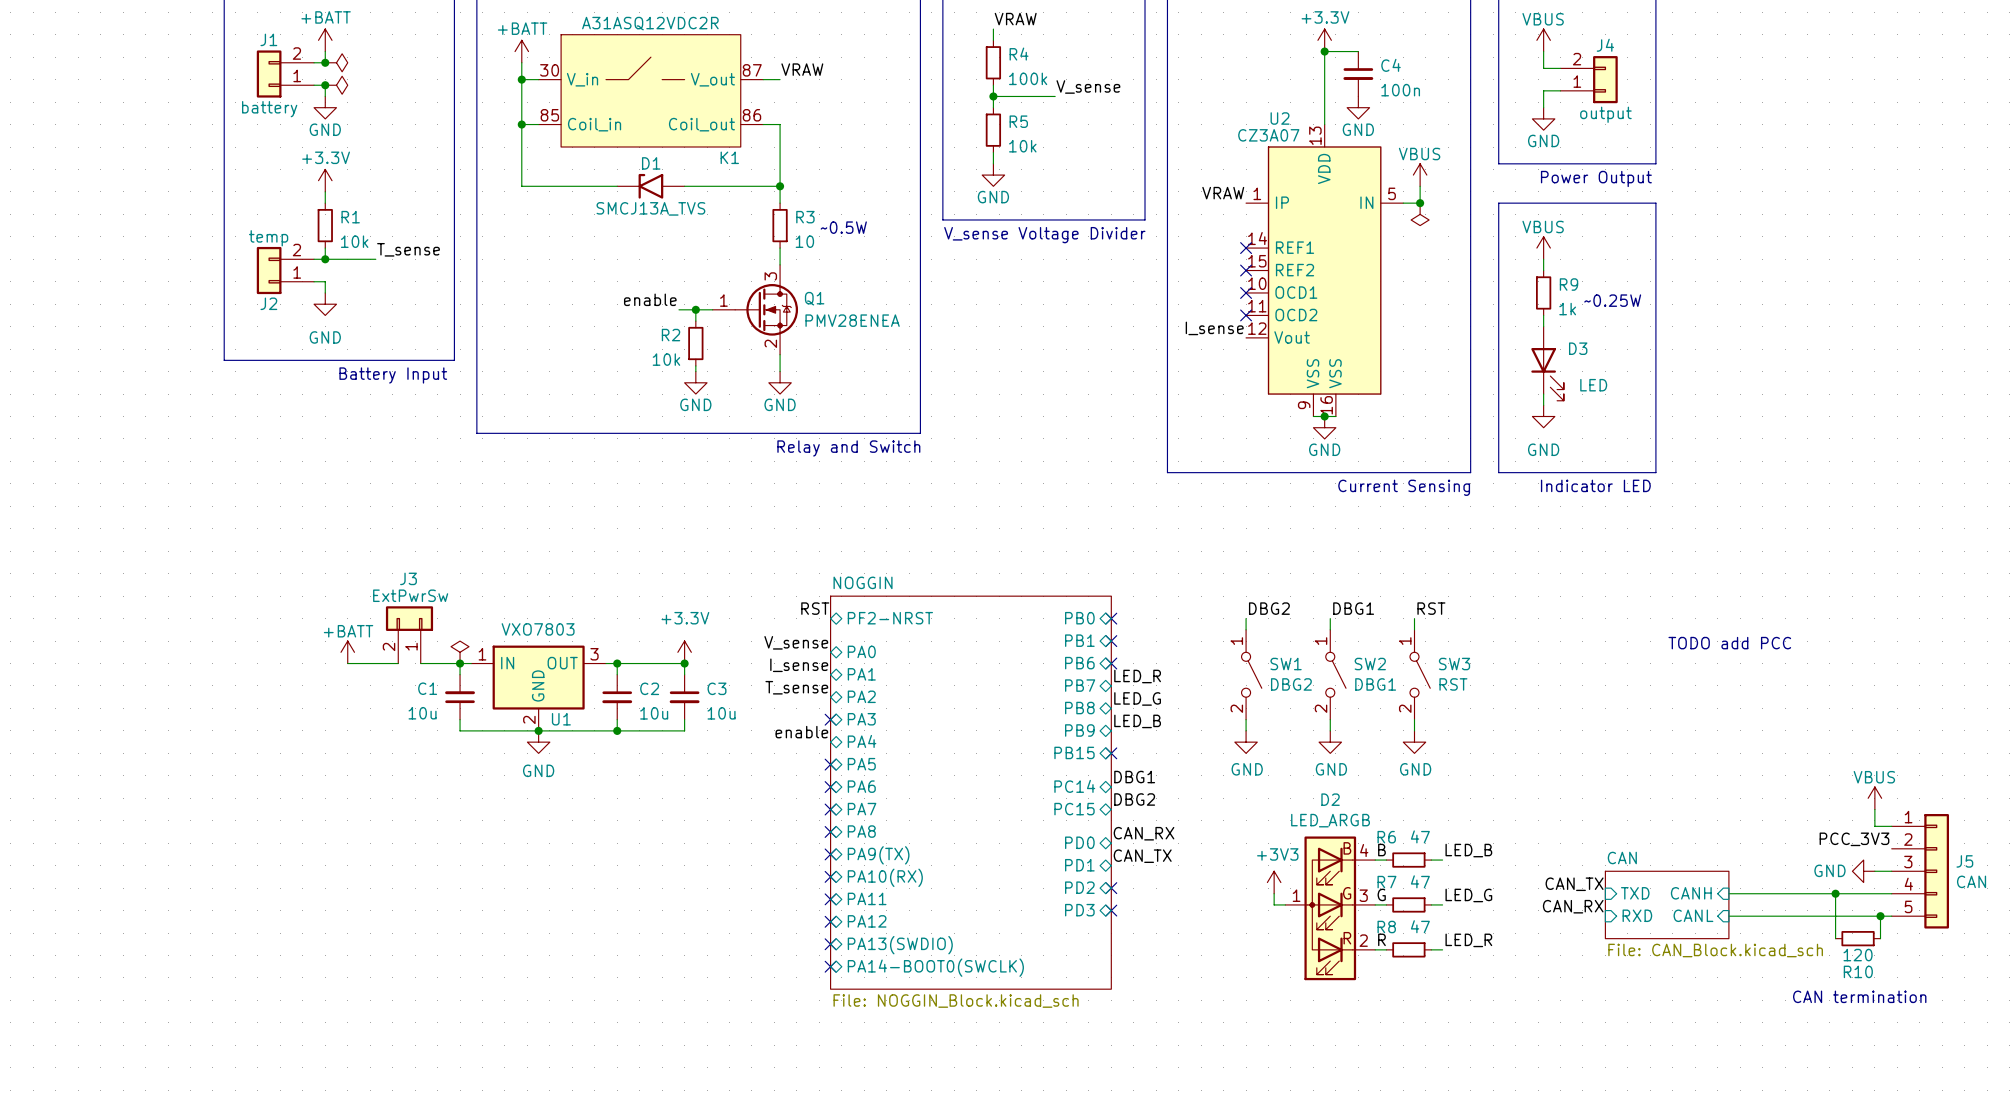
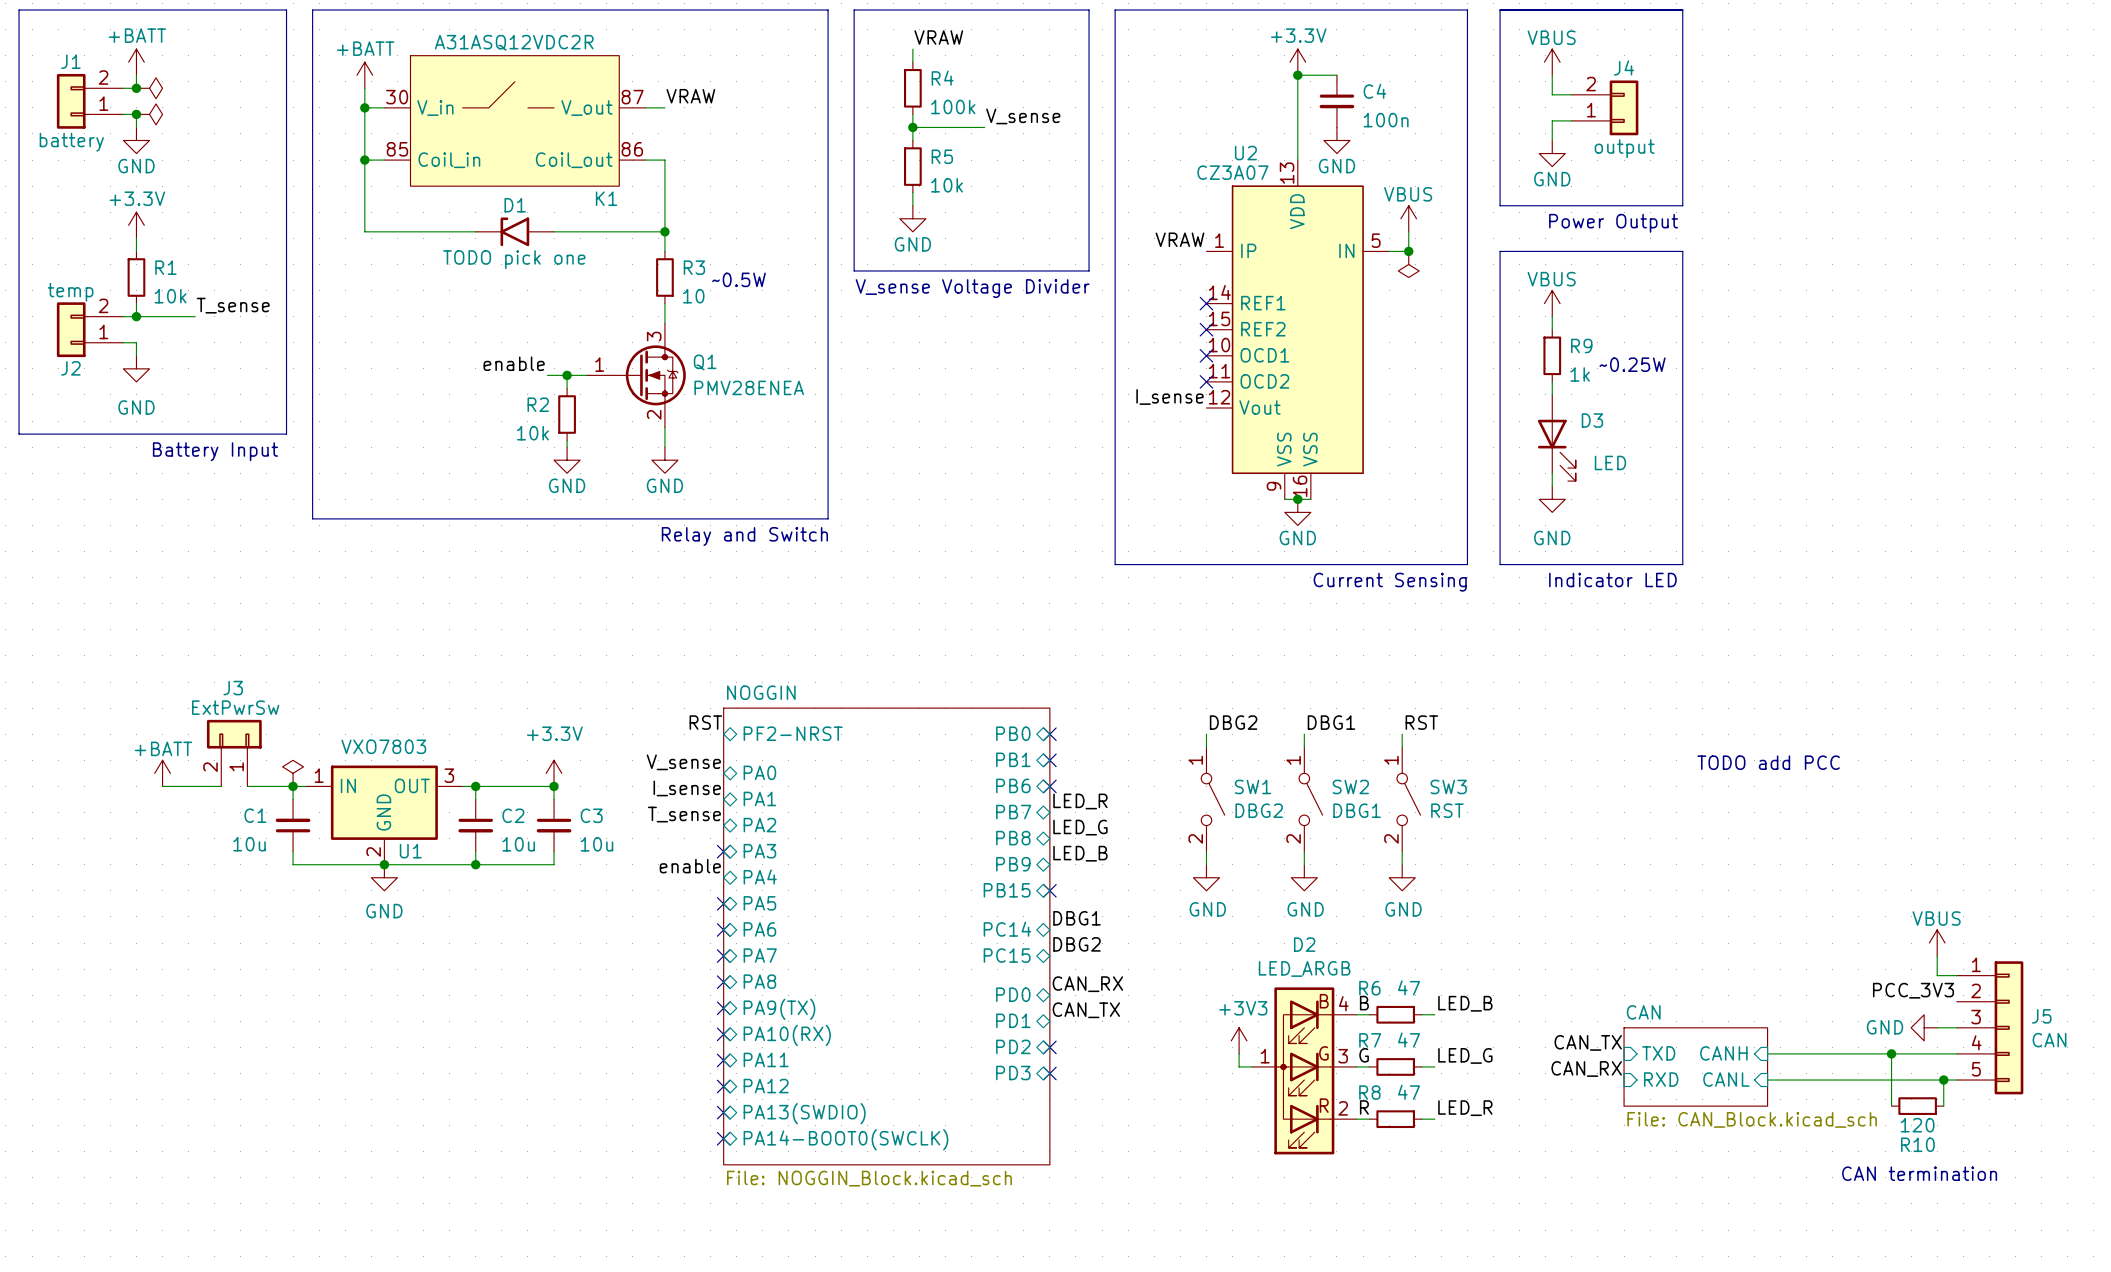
D1 value: SMCJ13A_TVS (650, 208) -> TODO pick one (514, 259)

